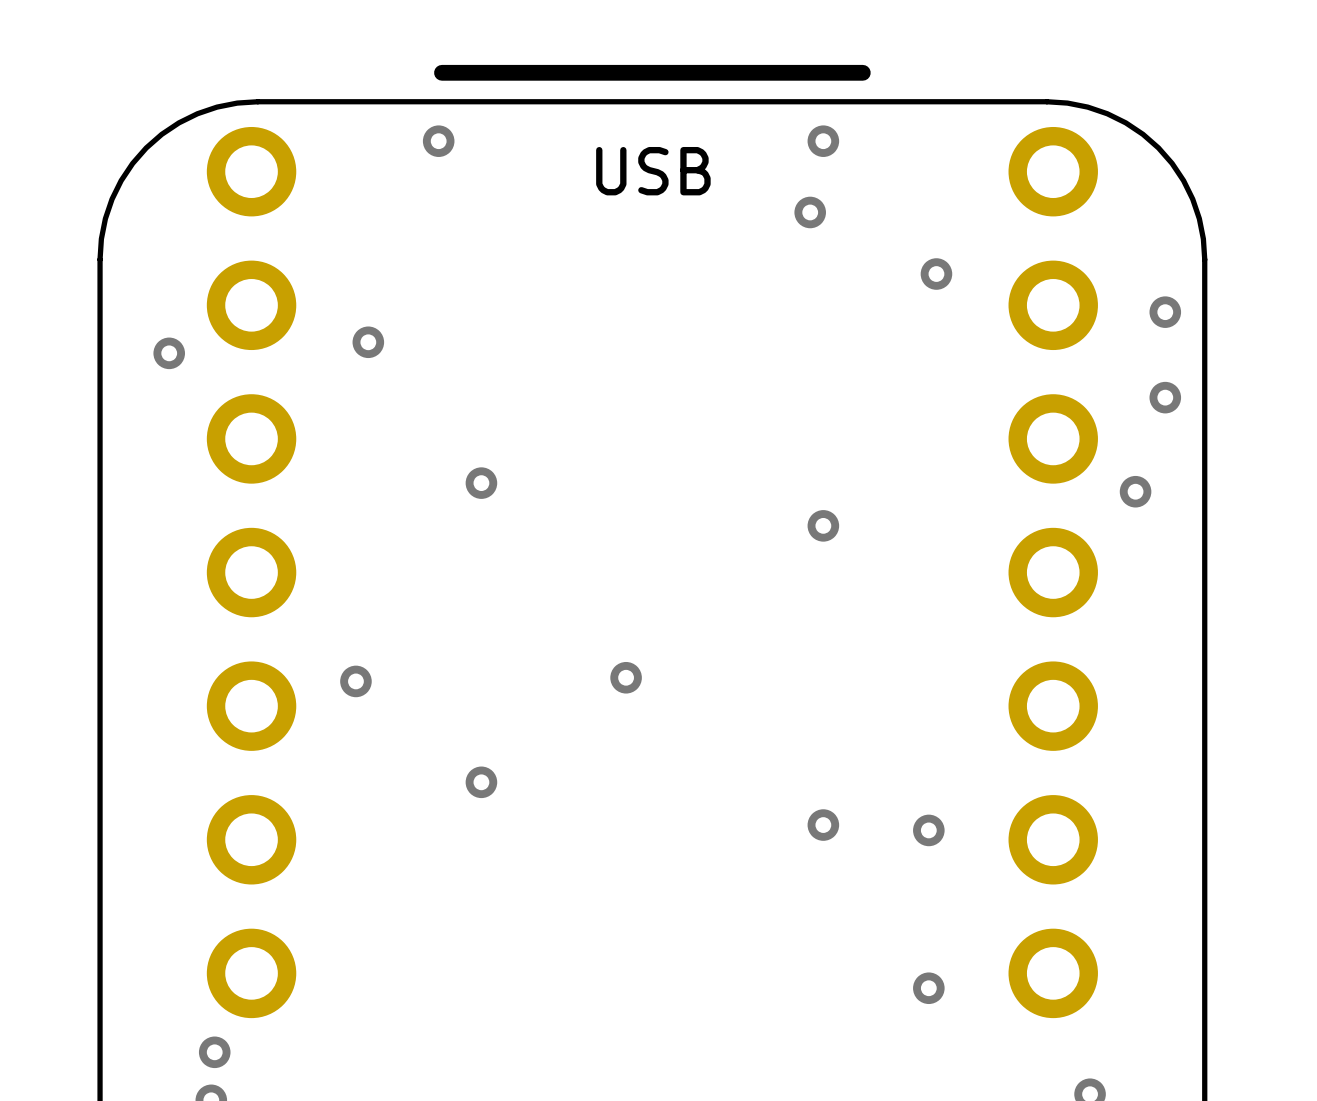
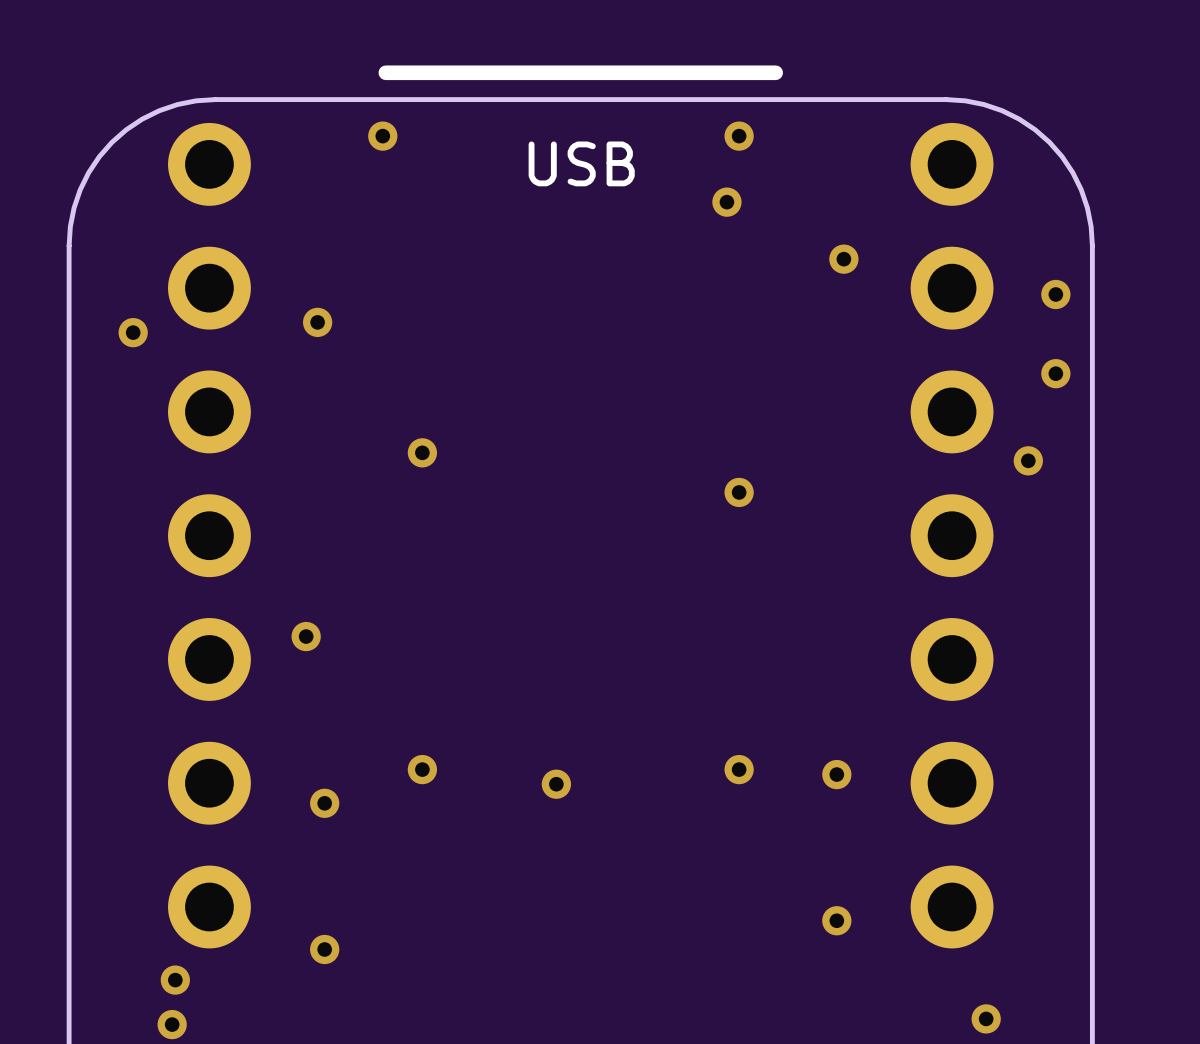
via: (626, 677) -> none
via position: (481, 782) -> (422, 769)
via: none -> (556, 784)
via: none -> (324, 803)
via: none -> (324, 949)

